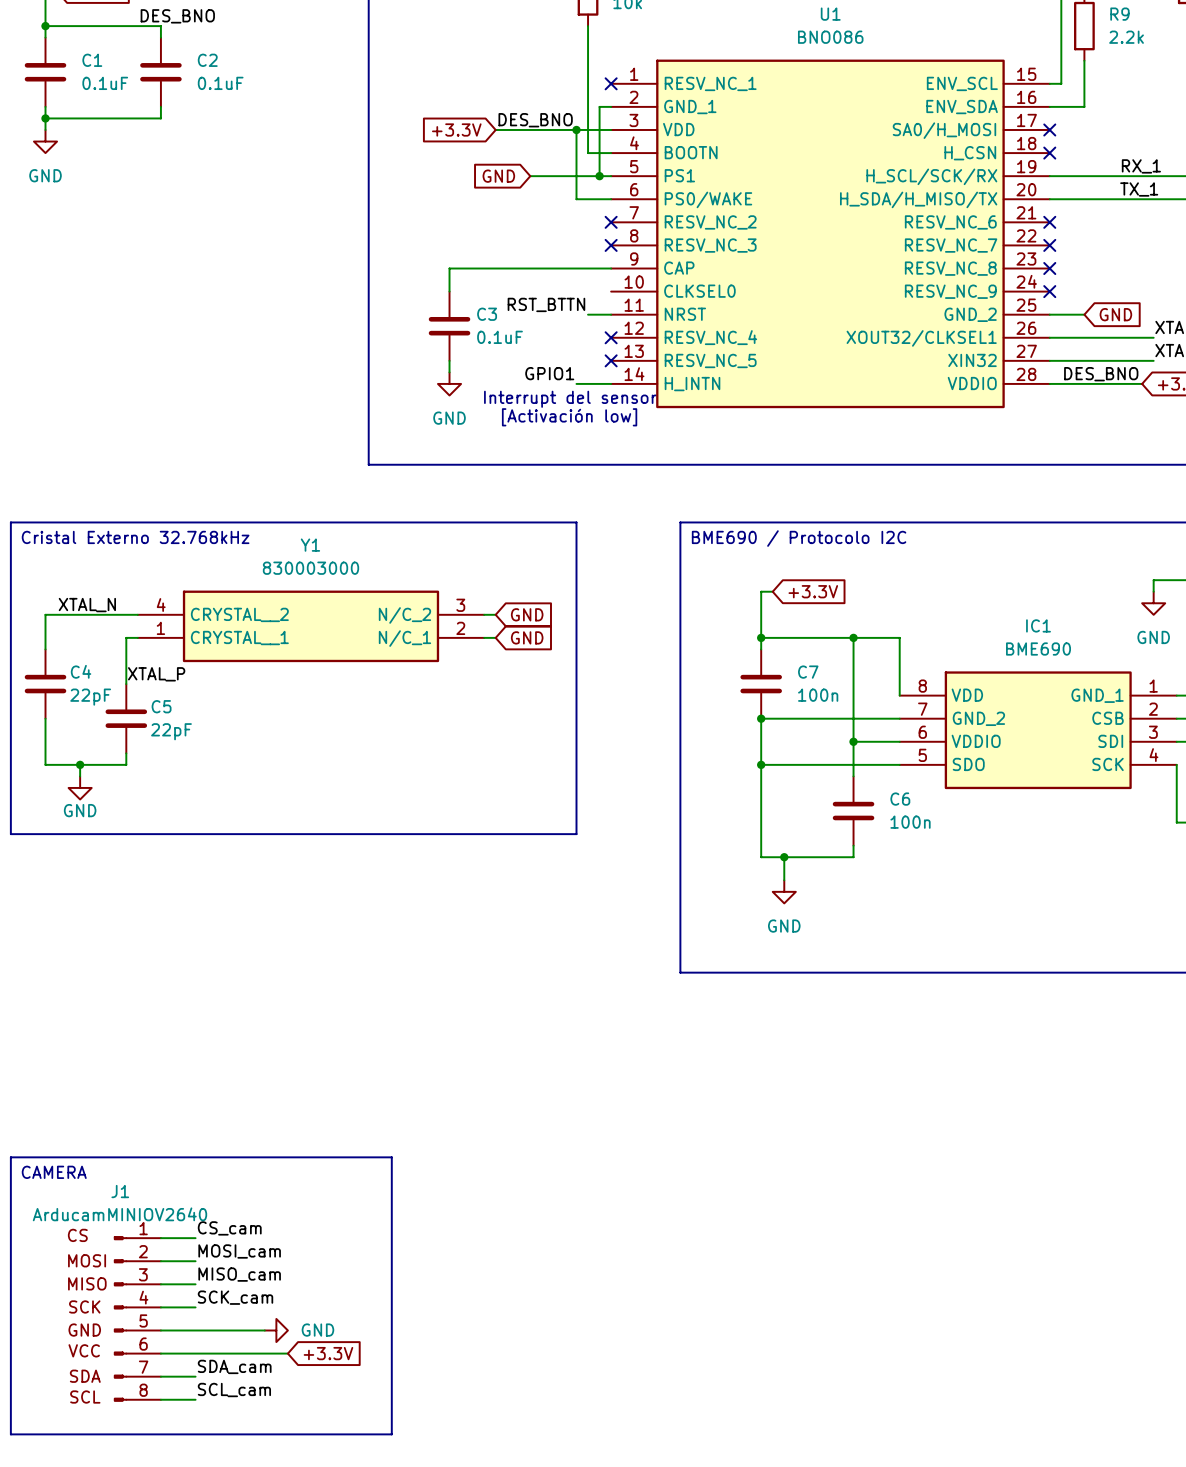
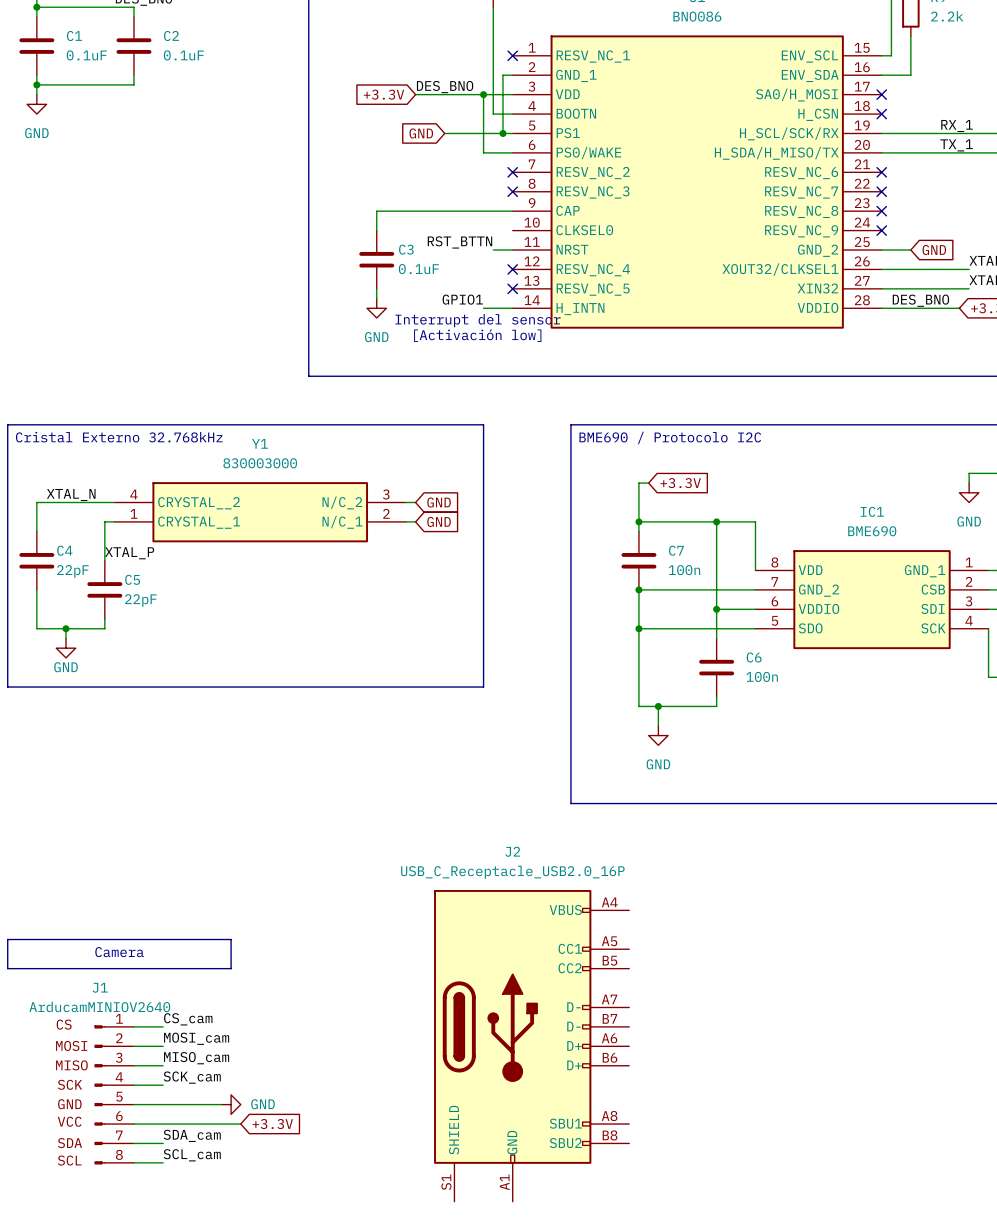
text: none -> Camera (119, 952)
line: (10, 1157) (391, 1157) (391, 1434) (10, 1434) (10, 1168) -> (7, 958) (7, 939) (231, 939) (231, 968) (7, 968)
text: CAMERA (54, 1172) -> none
J2: none -> USB_C_Receptacle_USB2.0_16P (531, 1045)

